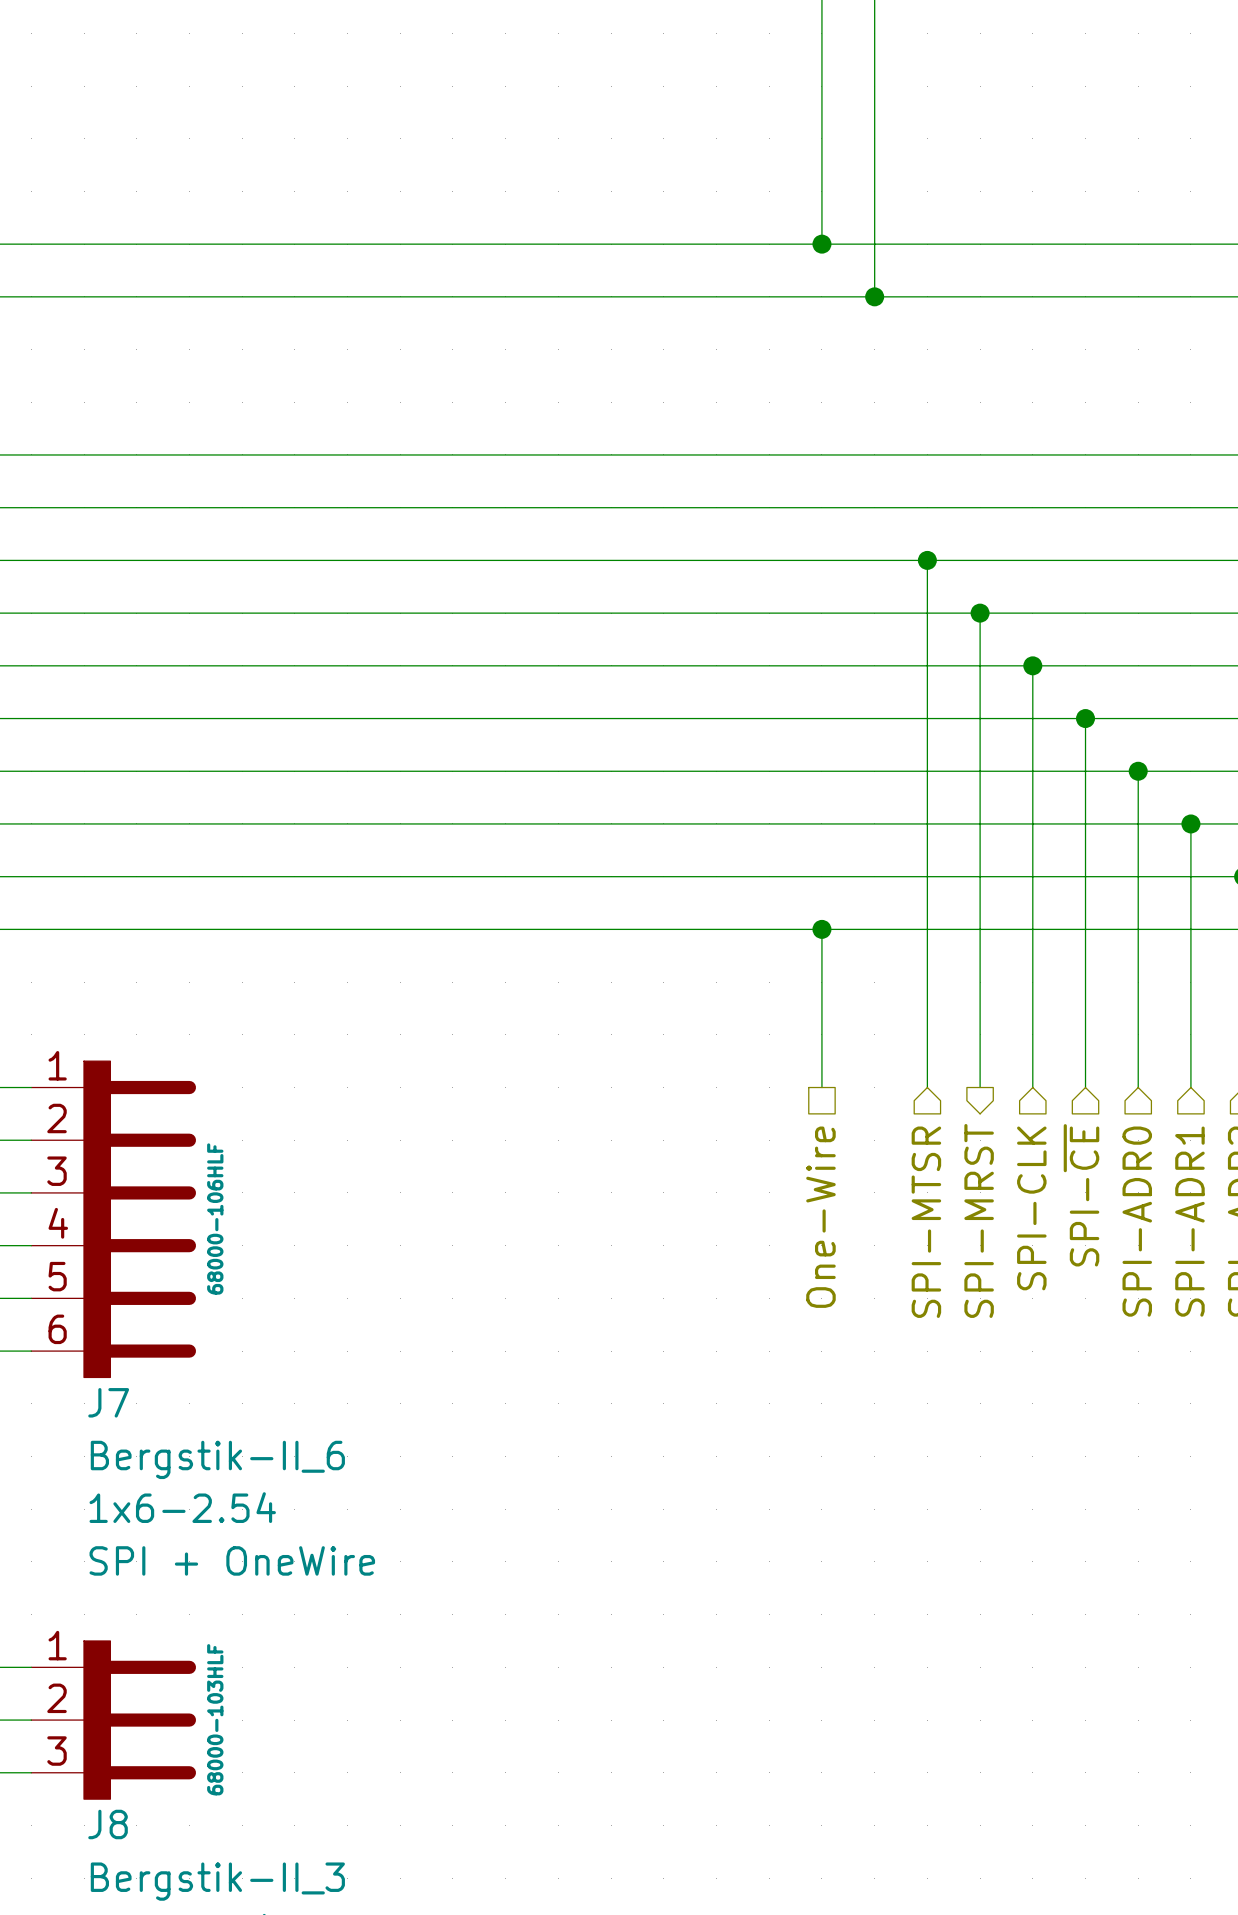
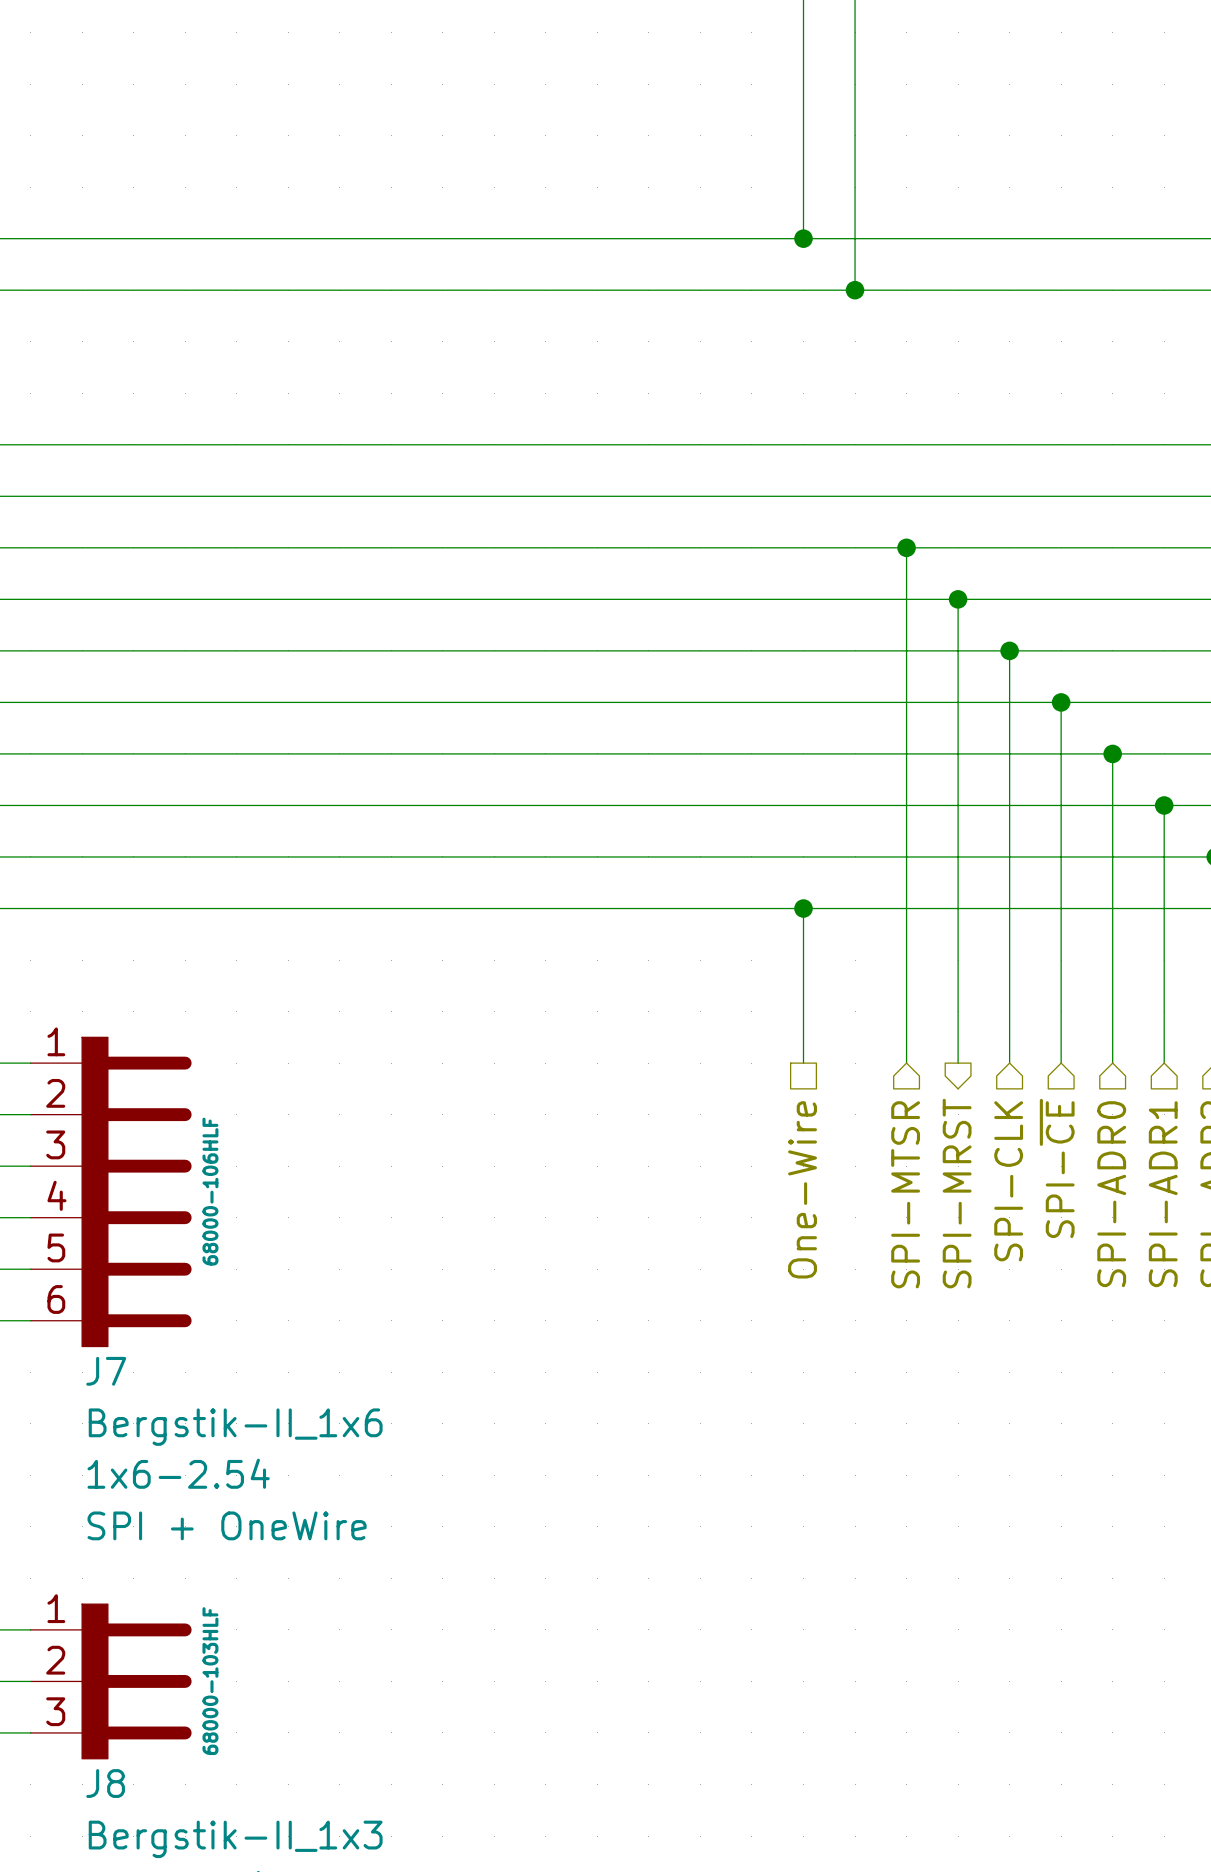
J7 value: Bergstik-II_6 (217, 1459) -> Bergstik-II_1x6 (235, 1427)
J8 value: Bergstik-II_3 (217, 1881) -> Bergstik-II_1x3 (235, 1839)

